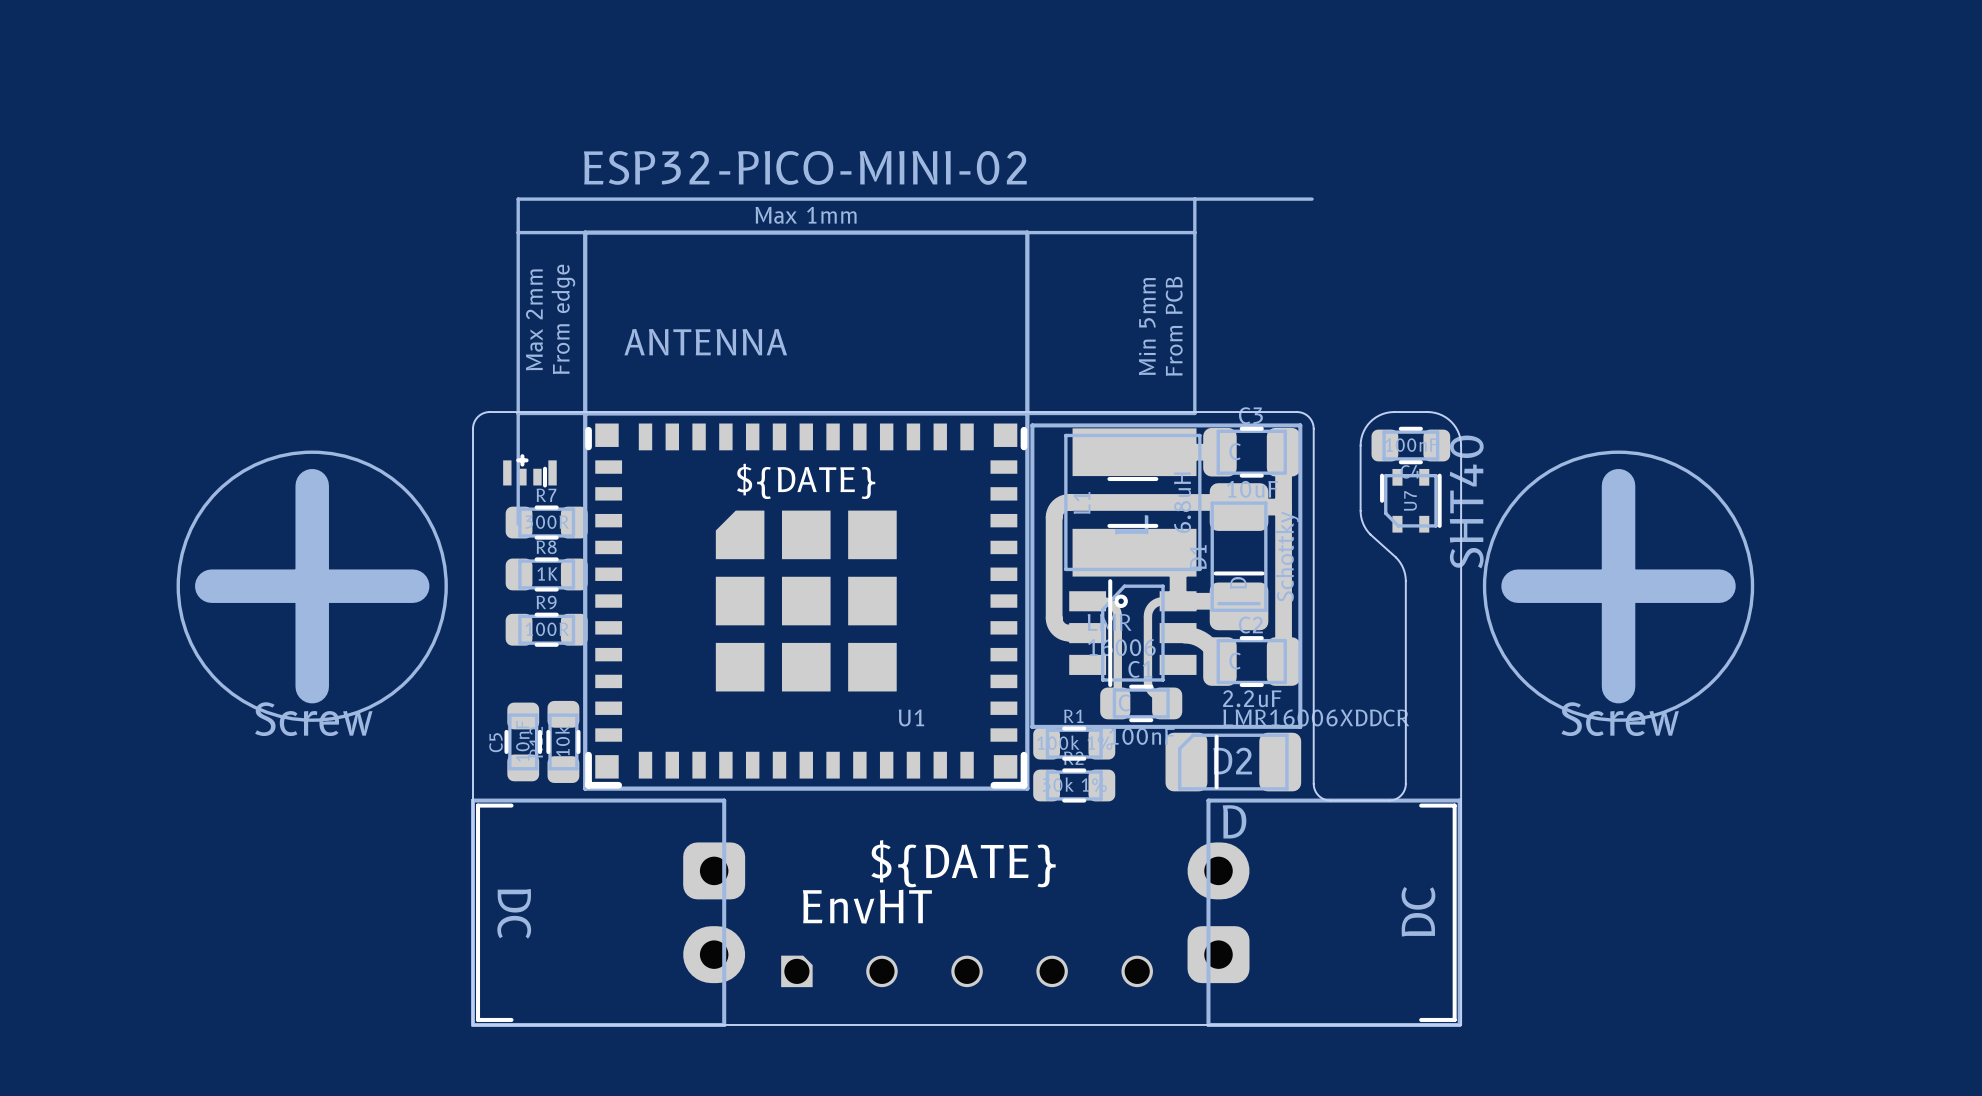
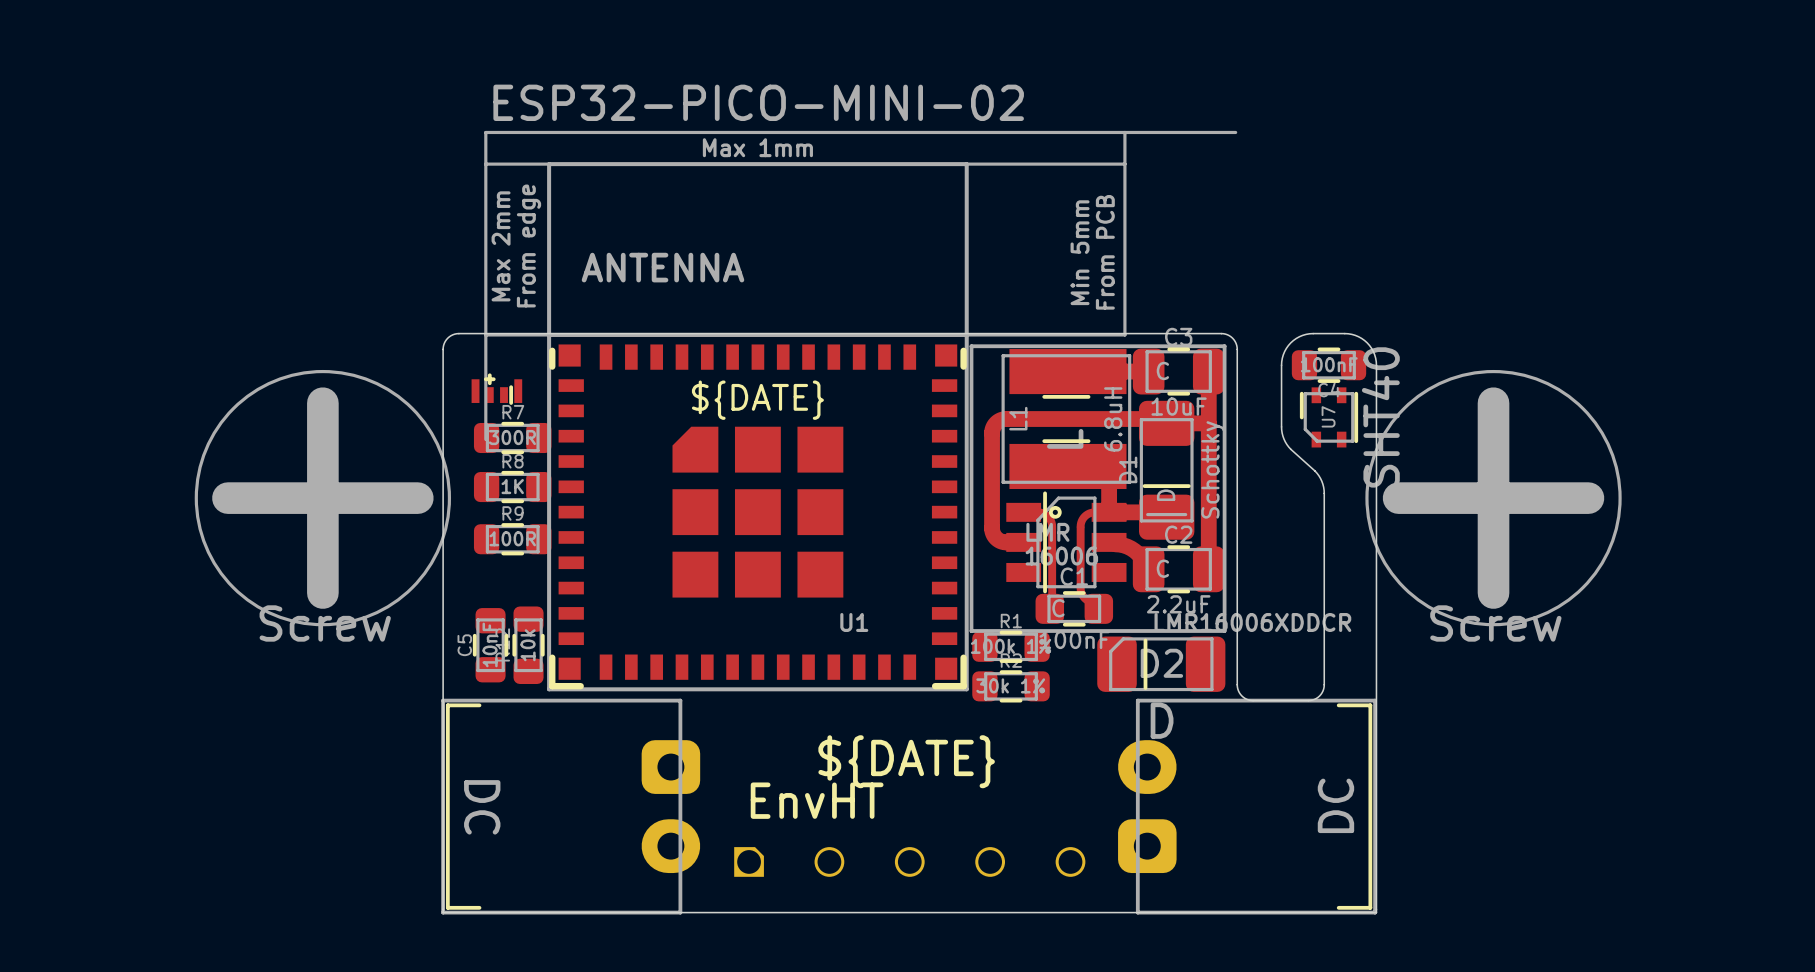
drawing position: (312, 586) -> (322, 498)
drawing position: (1618, 586) -> (1493, 498)

